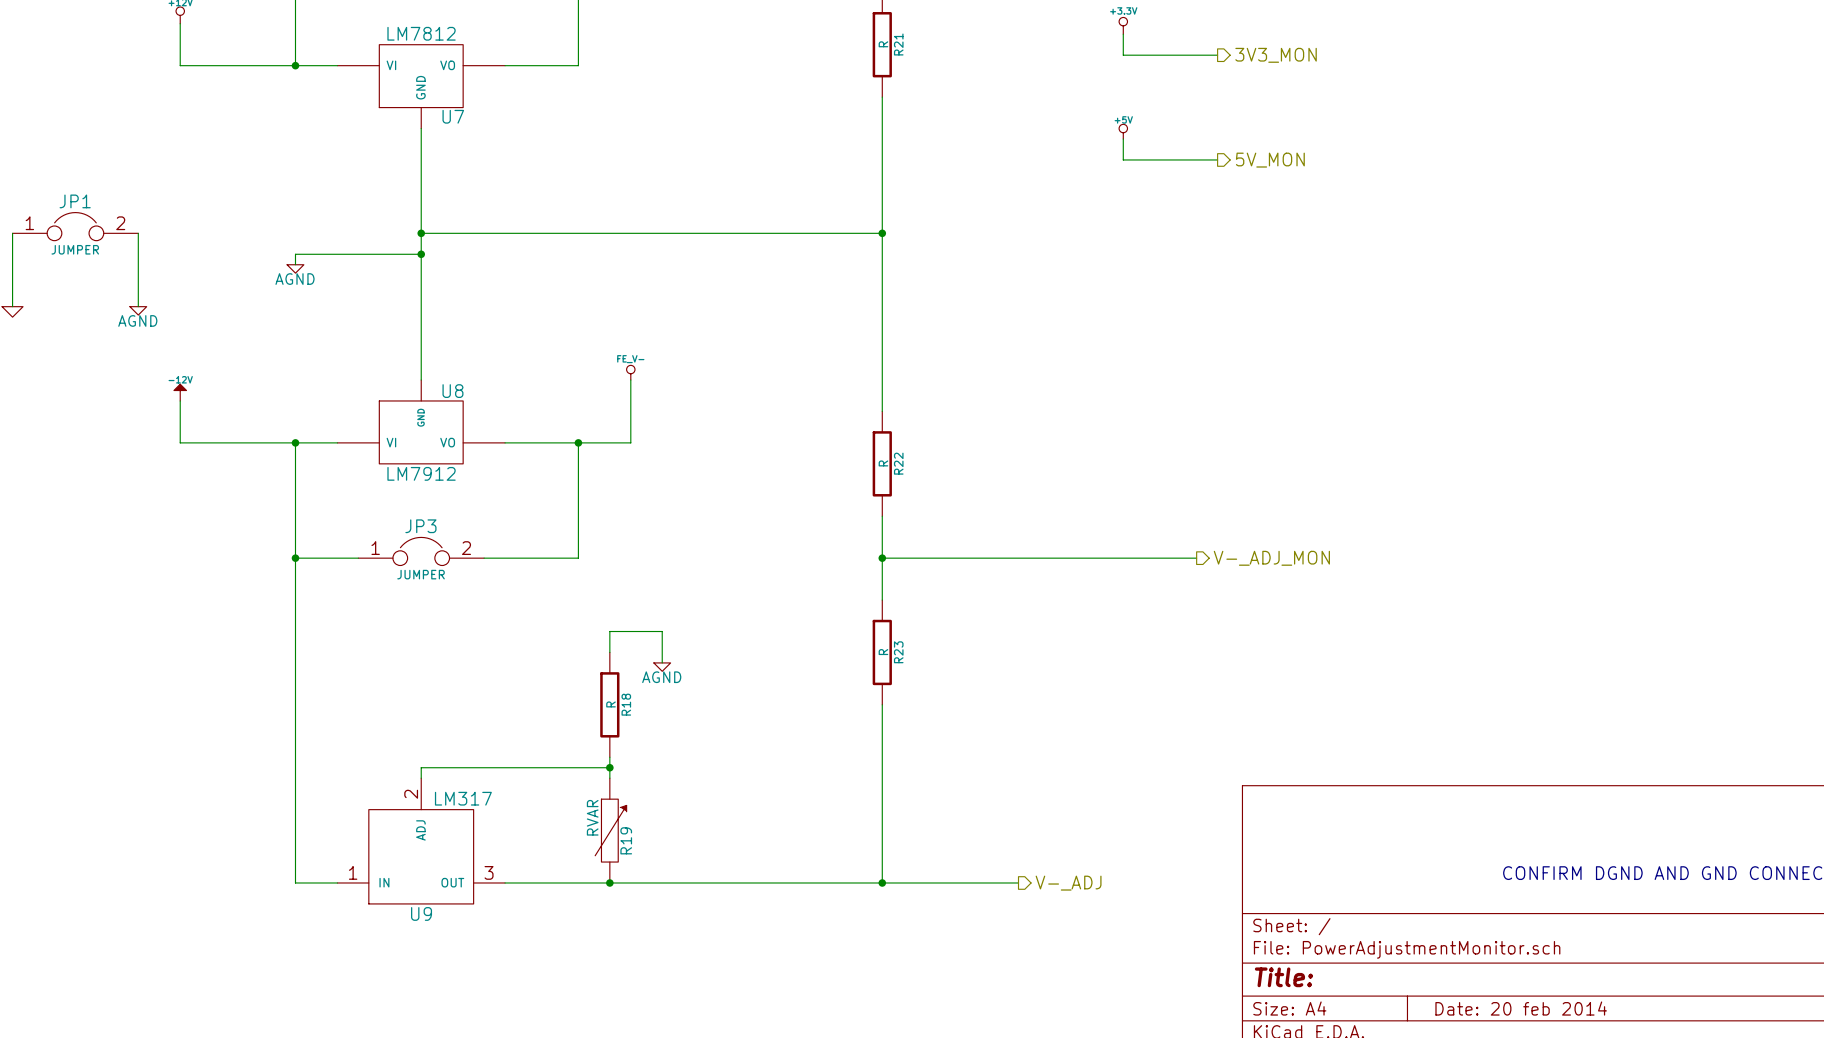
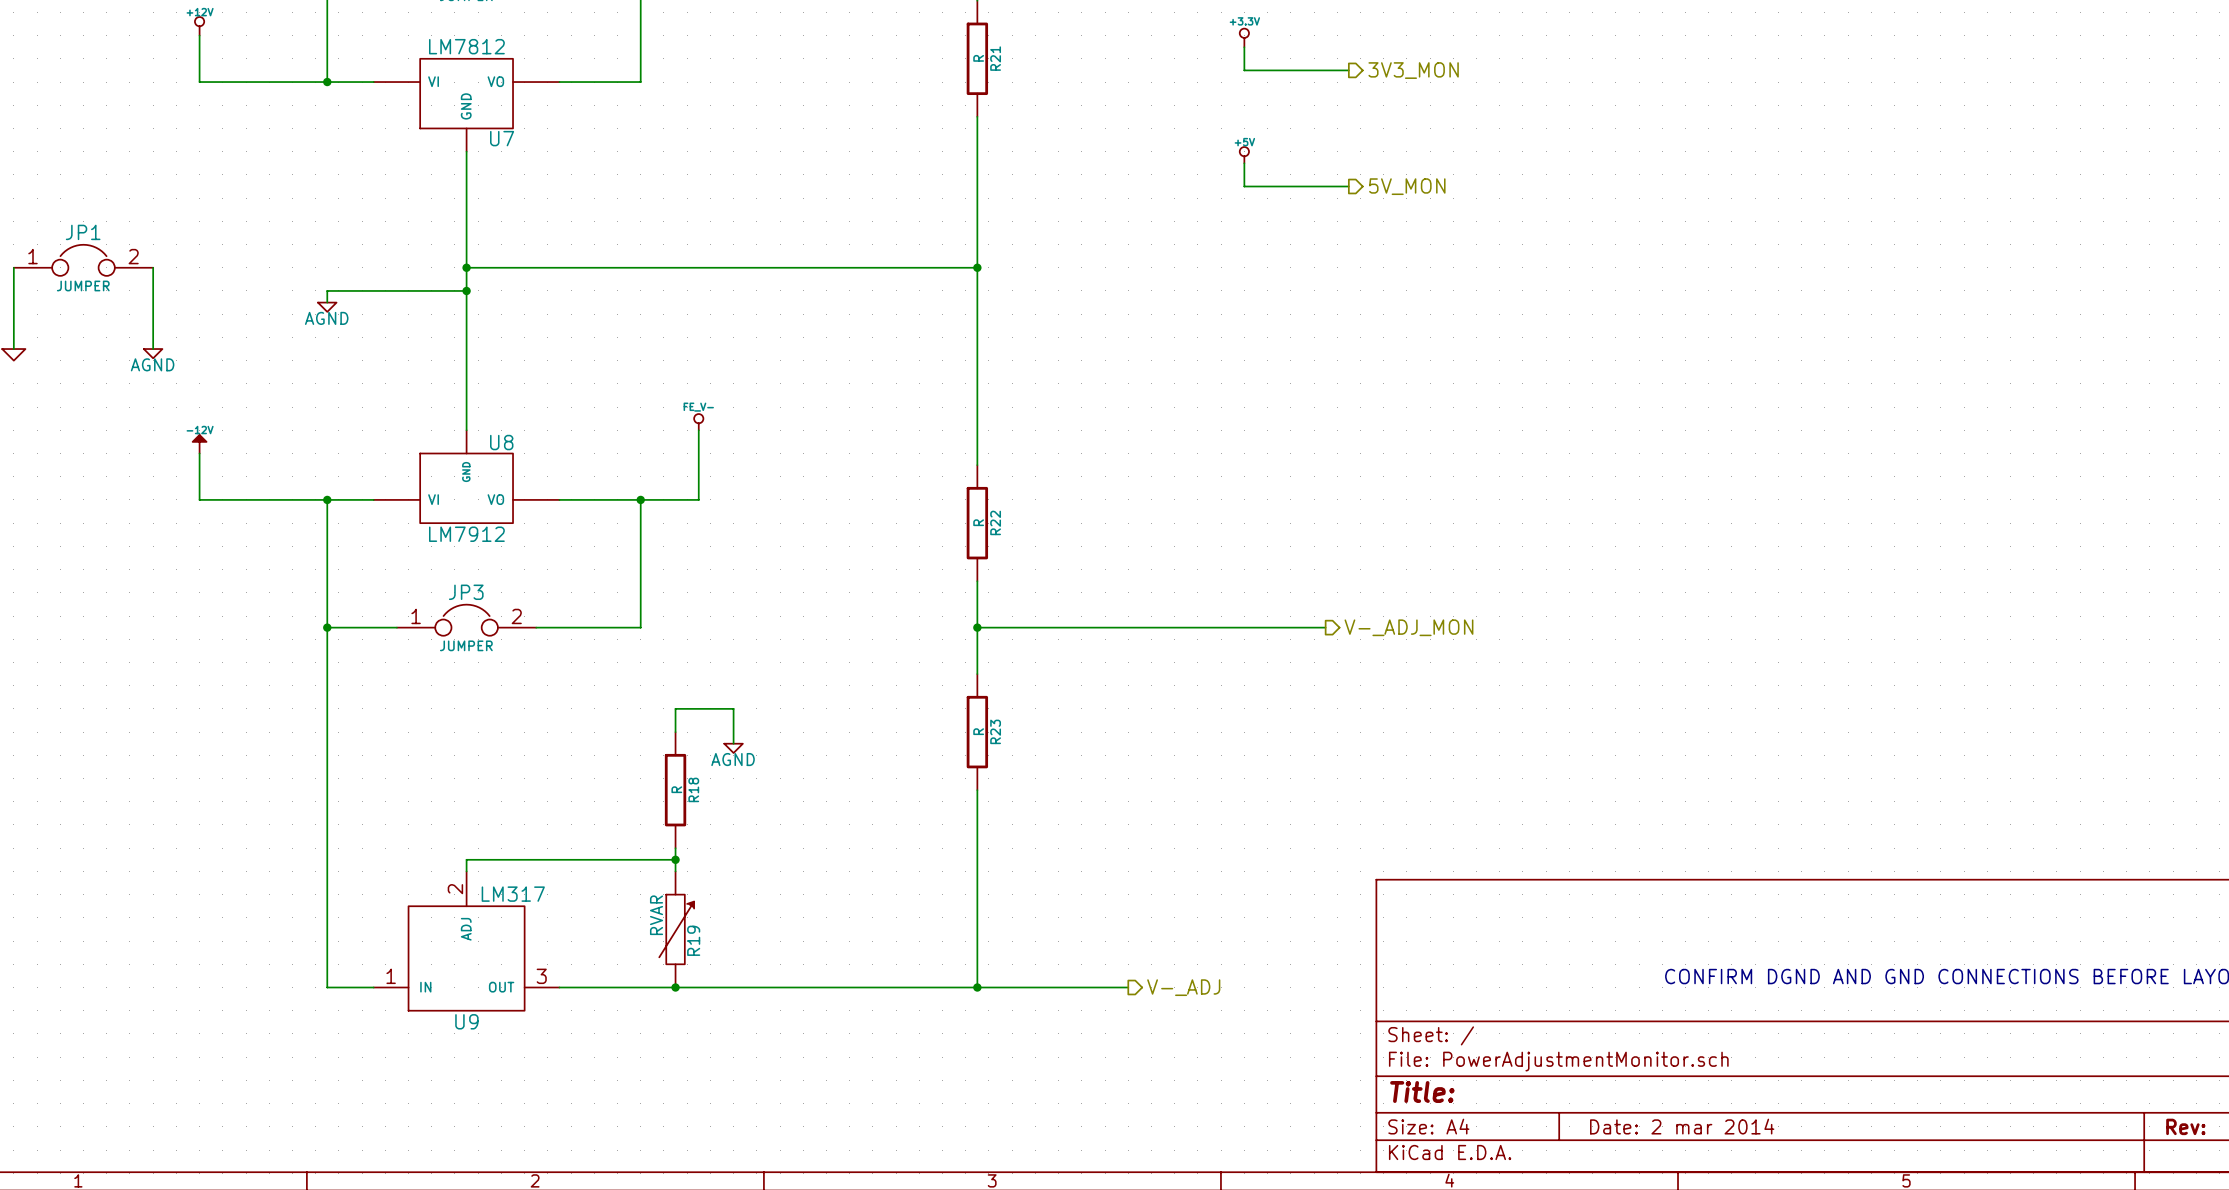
title block: Date: 20 feb 2014 (1521, 1008) -> Date: 2 mar 2014 (1682, 1126)

